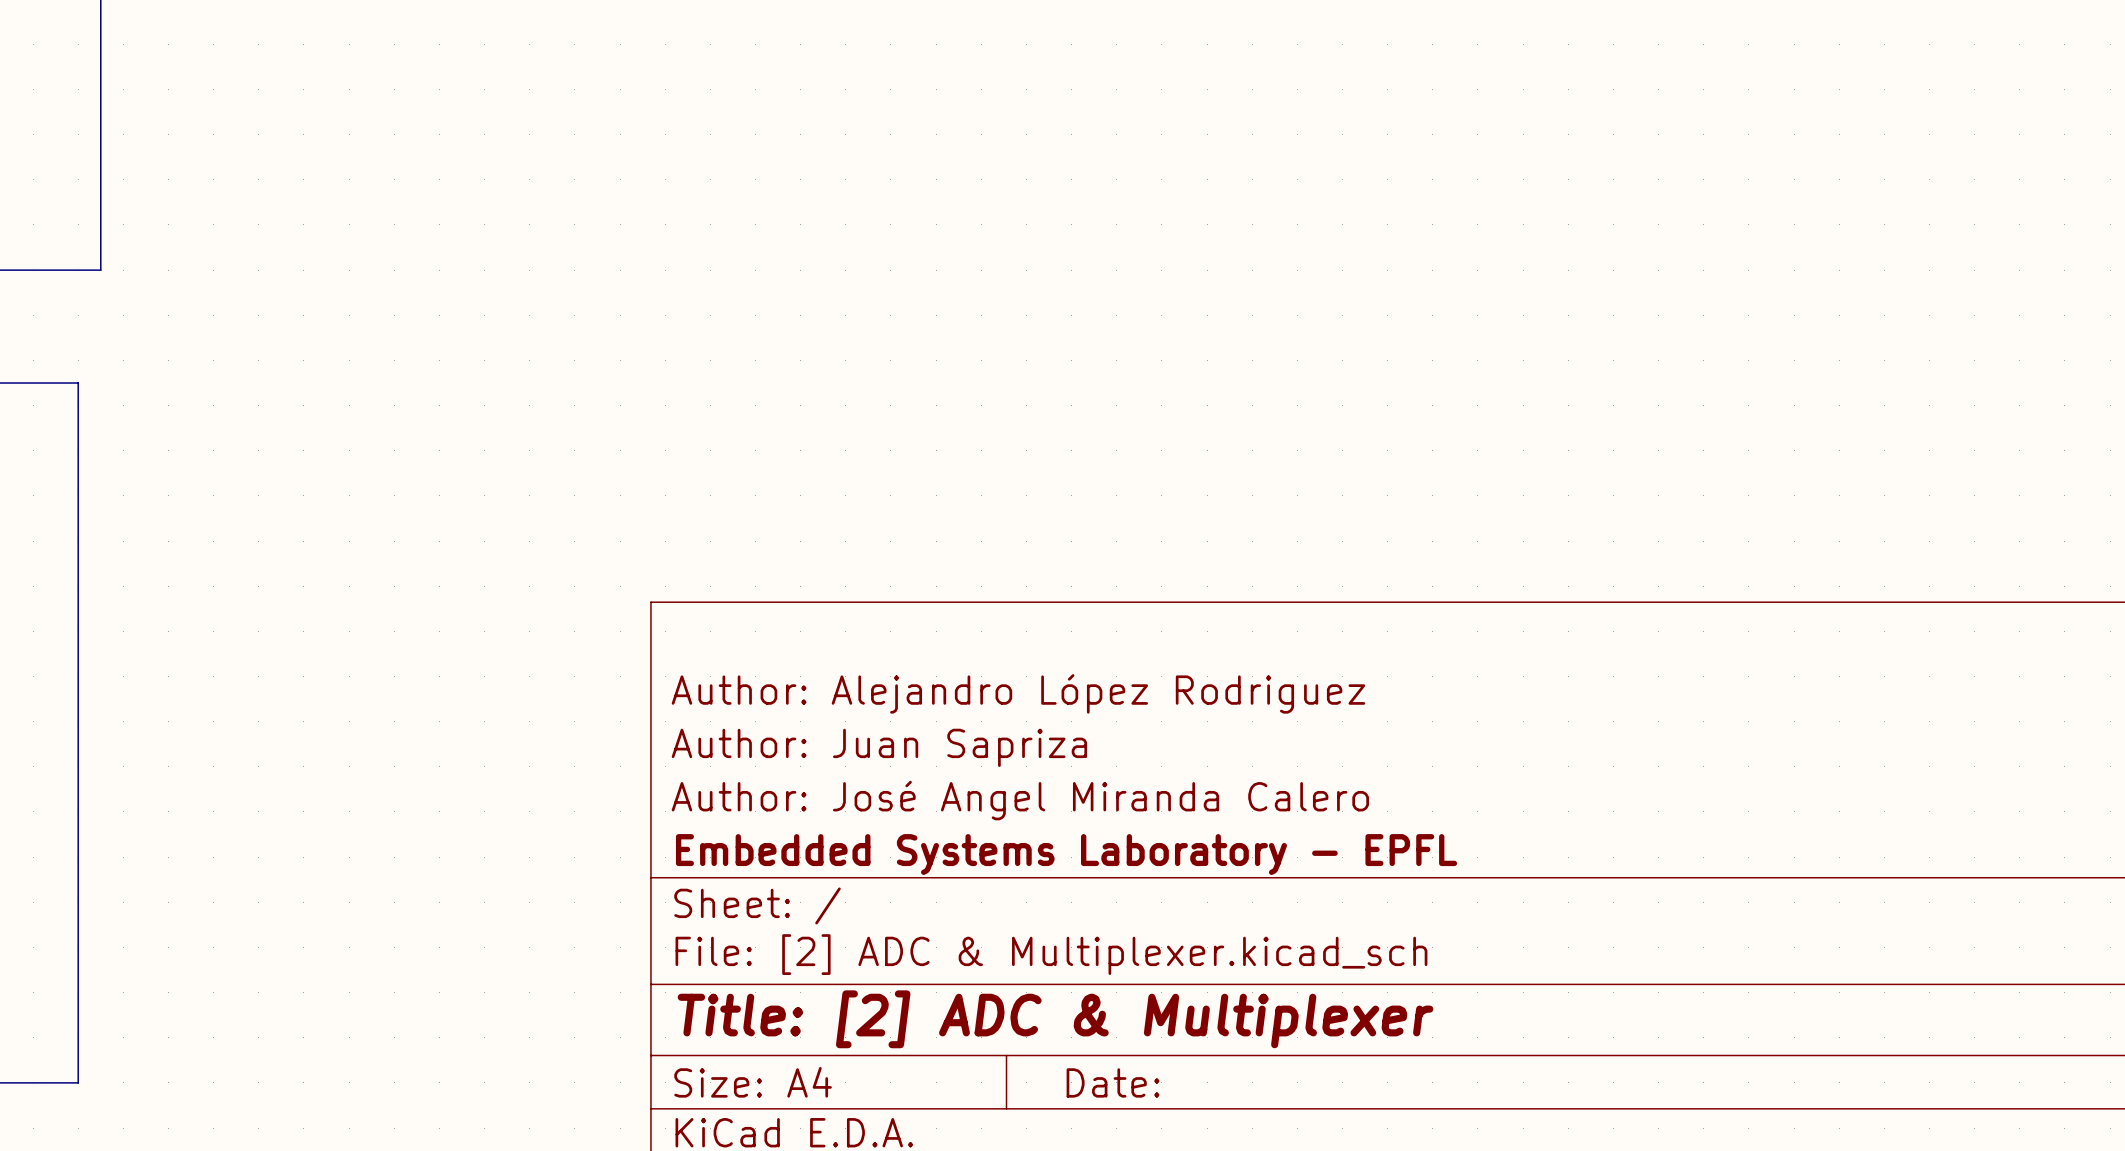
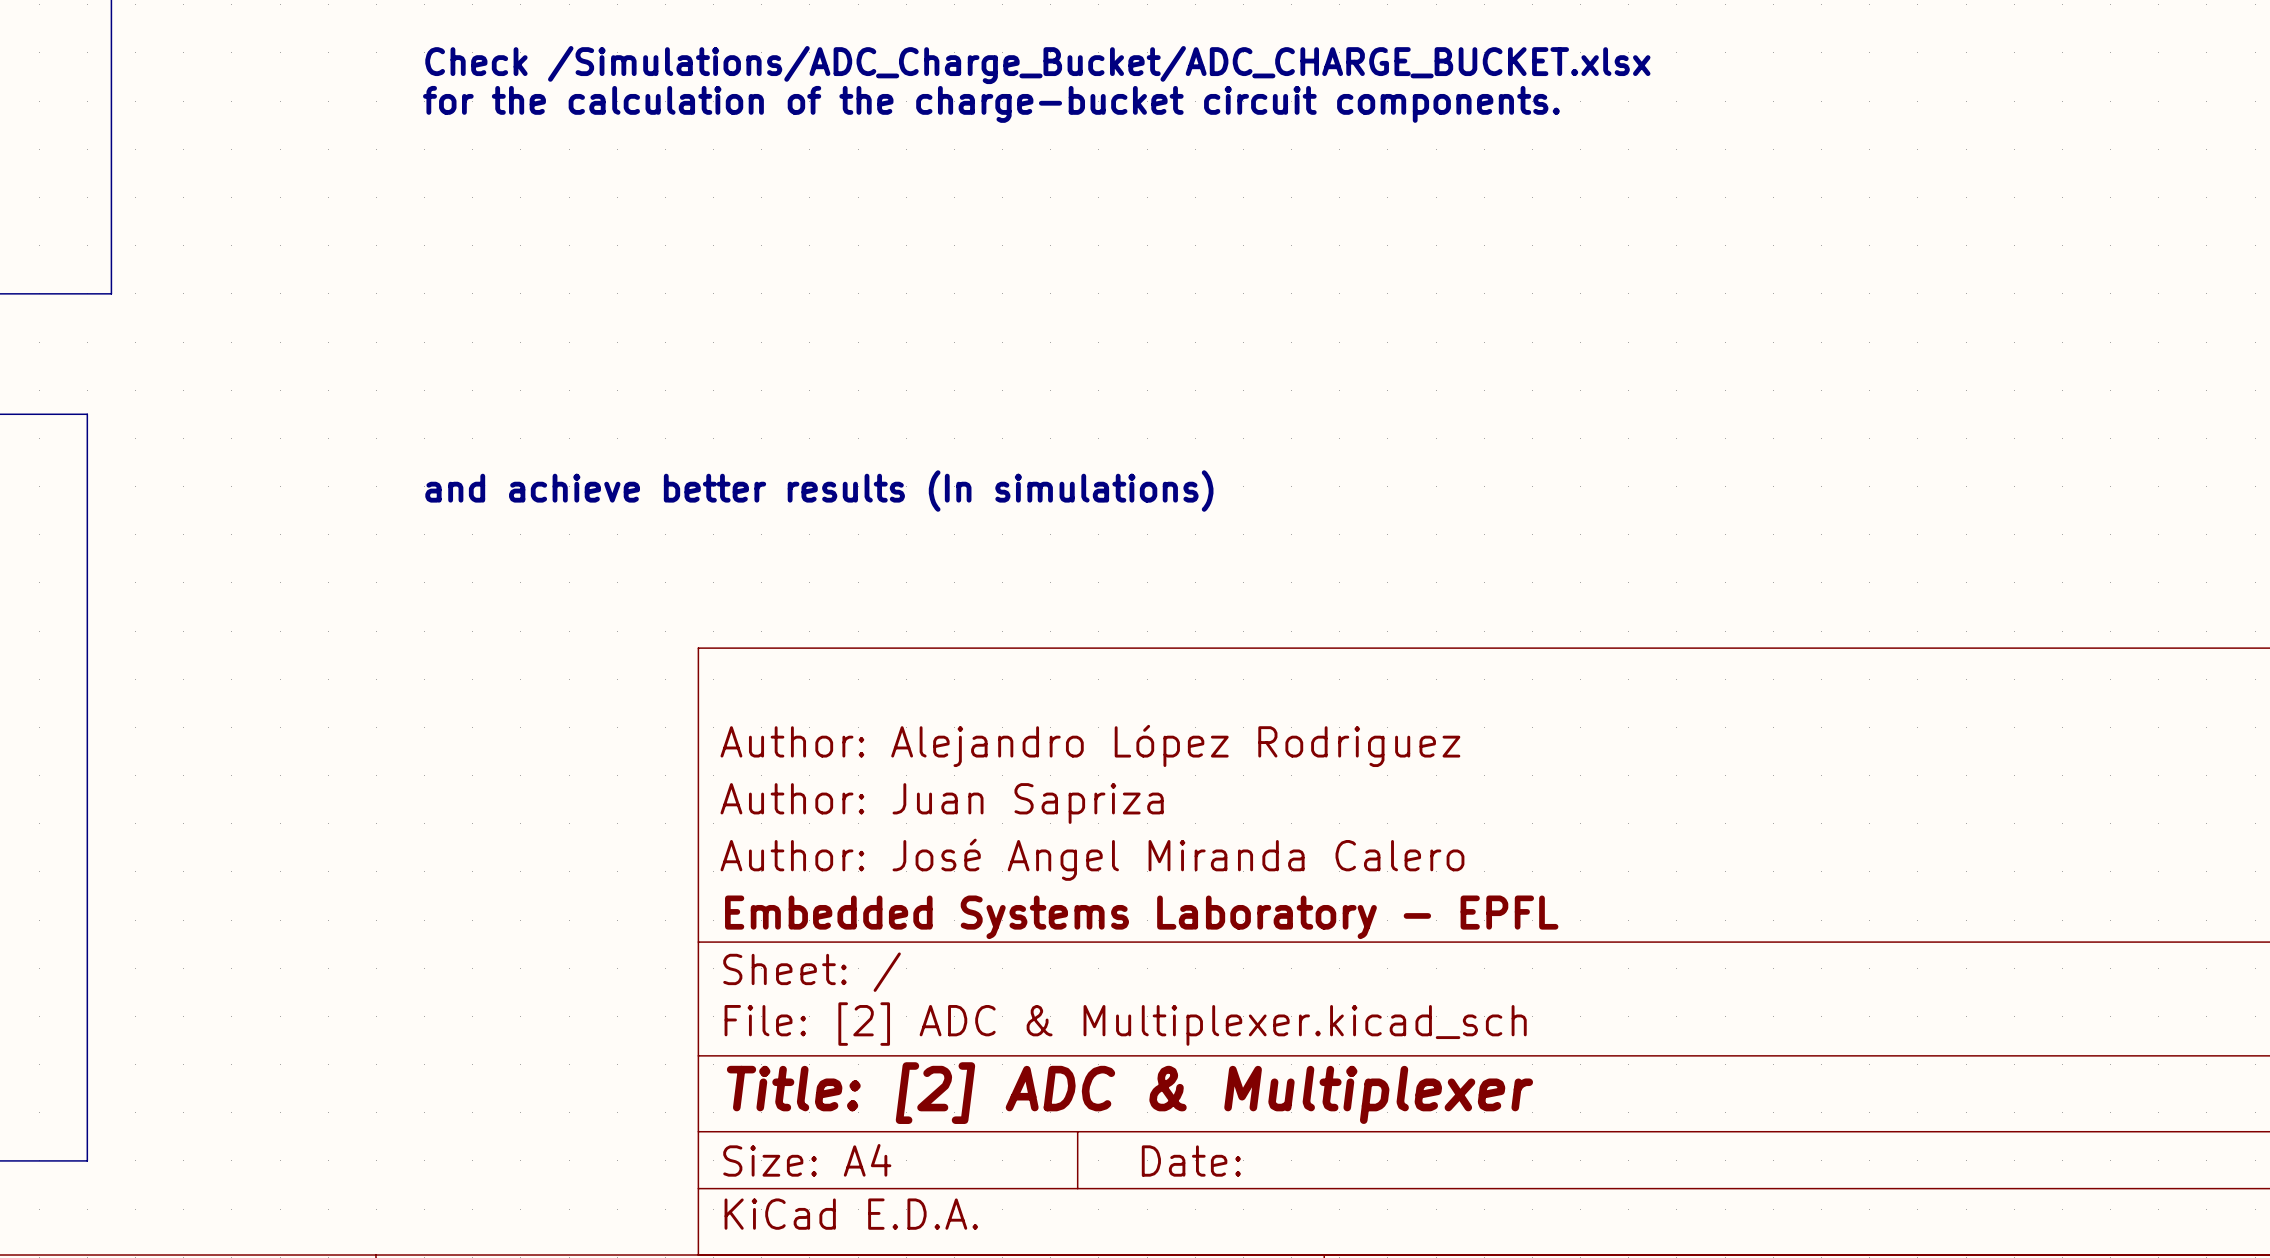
text: none -> Check /Simulations/ADC_Charge_Bucket/ADC_CHARGE_BUCKET.xlsx (1037, 65)
text: none -> for the calculation of the charge-bucket circuit components. (991, 104)
text: none -> and achieve better results (In simulations) (819, 491)

